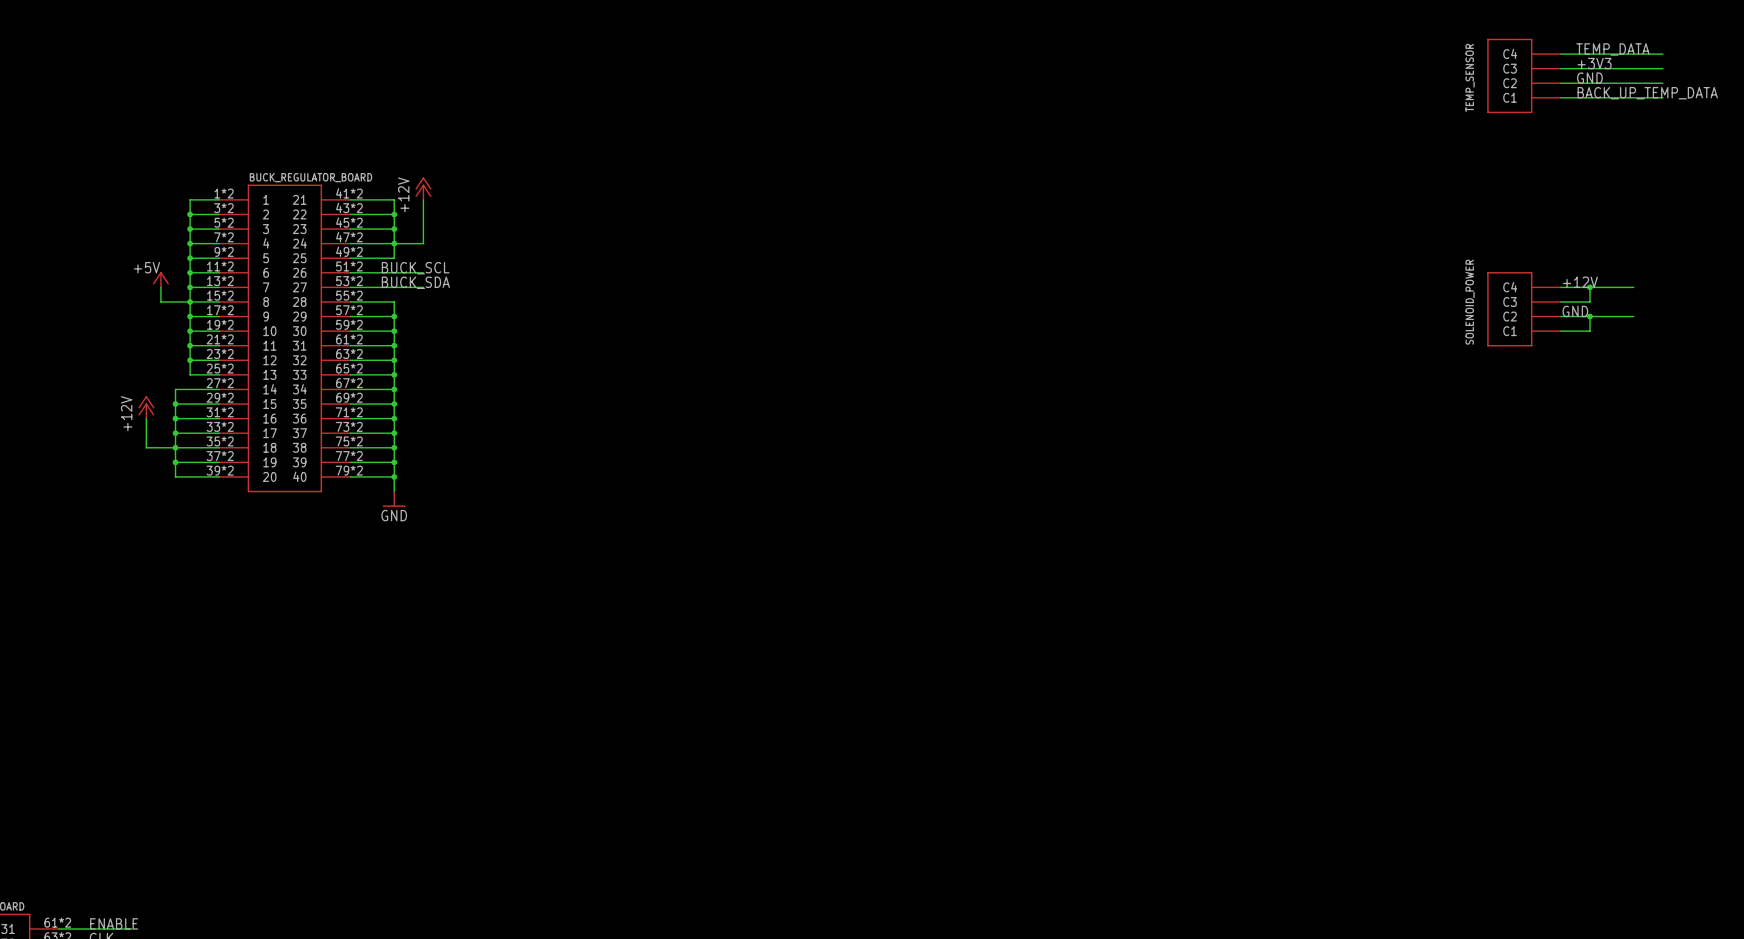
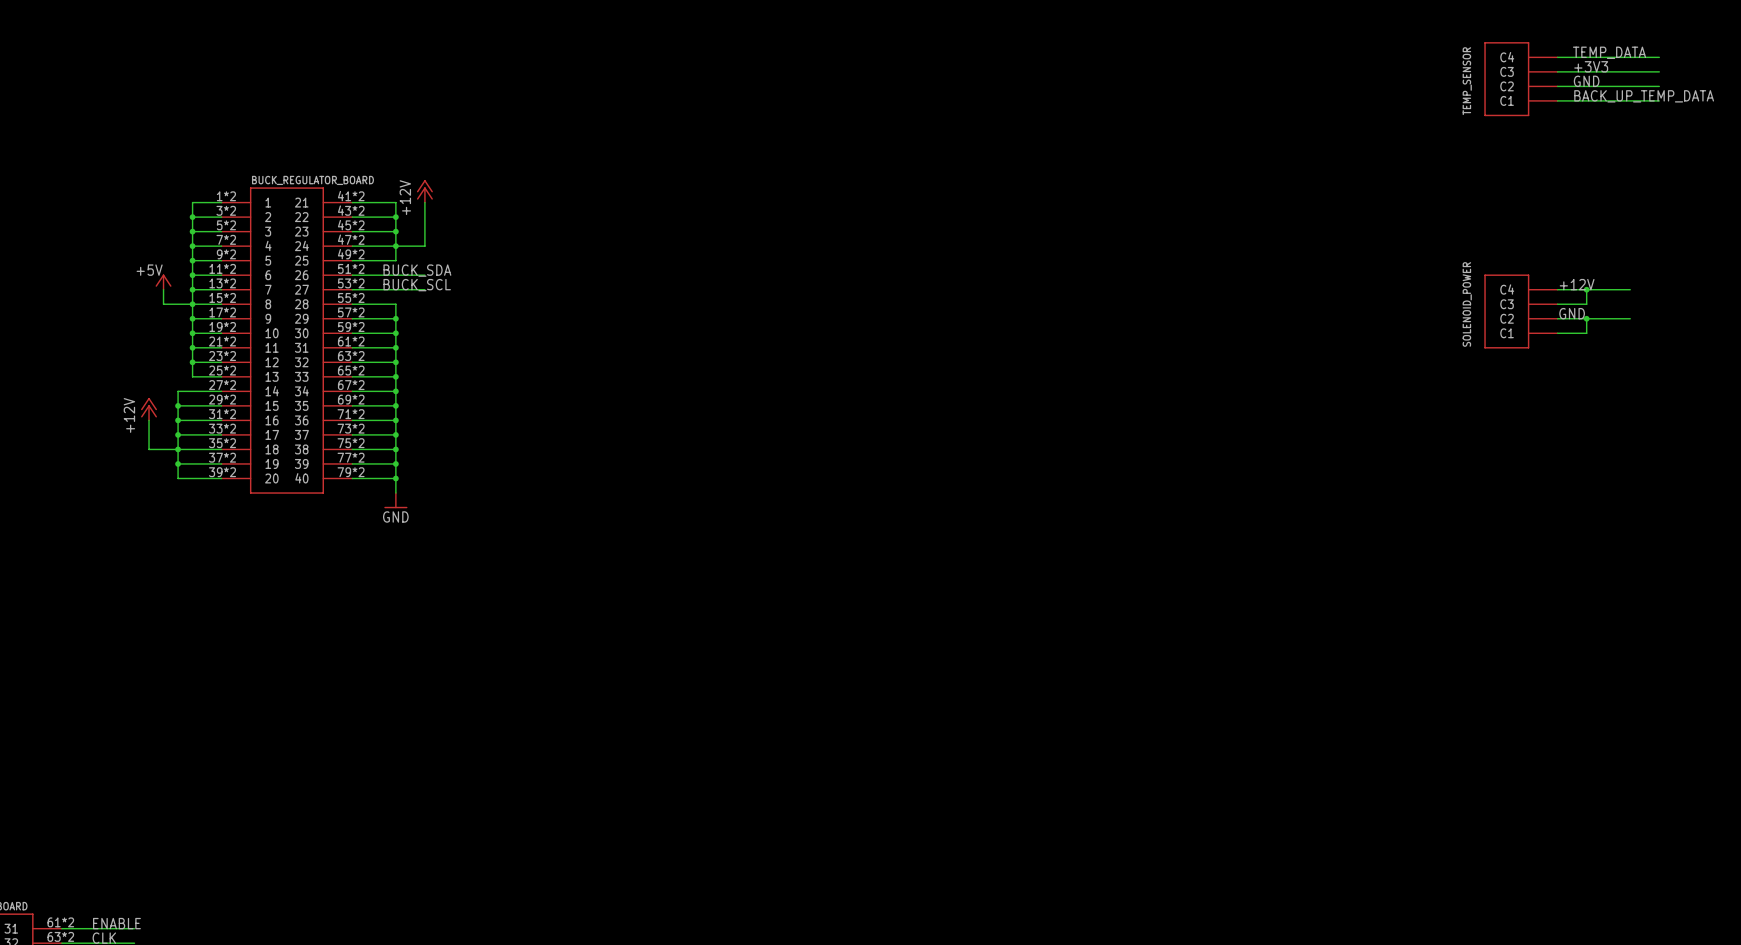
label: BUCK_SCL (415, 268) -> BUCK_SDA (417, 270)
label: BUCK_SDA (415, 282) -> BUCK_SCL (417, 285)

